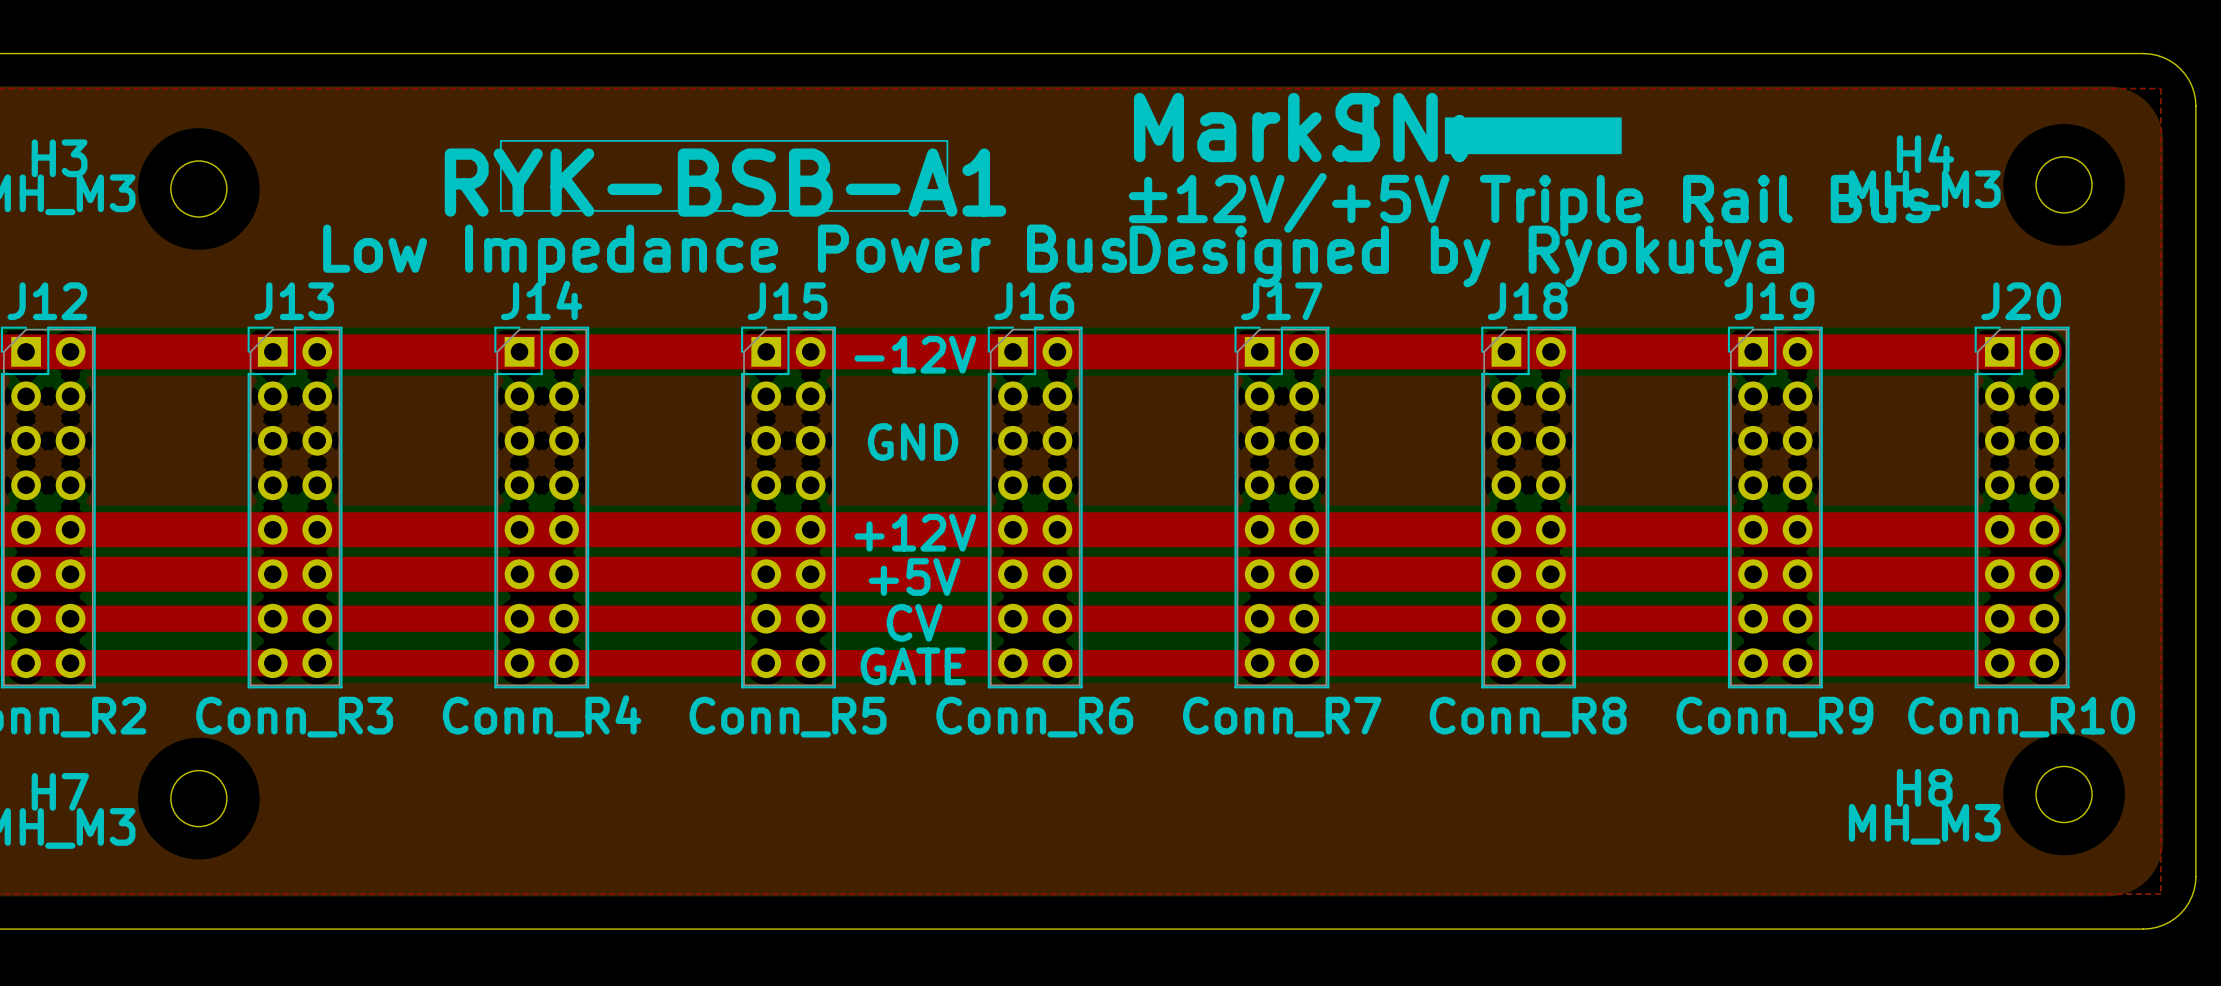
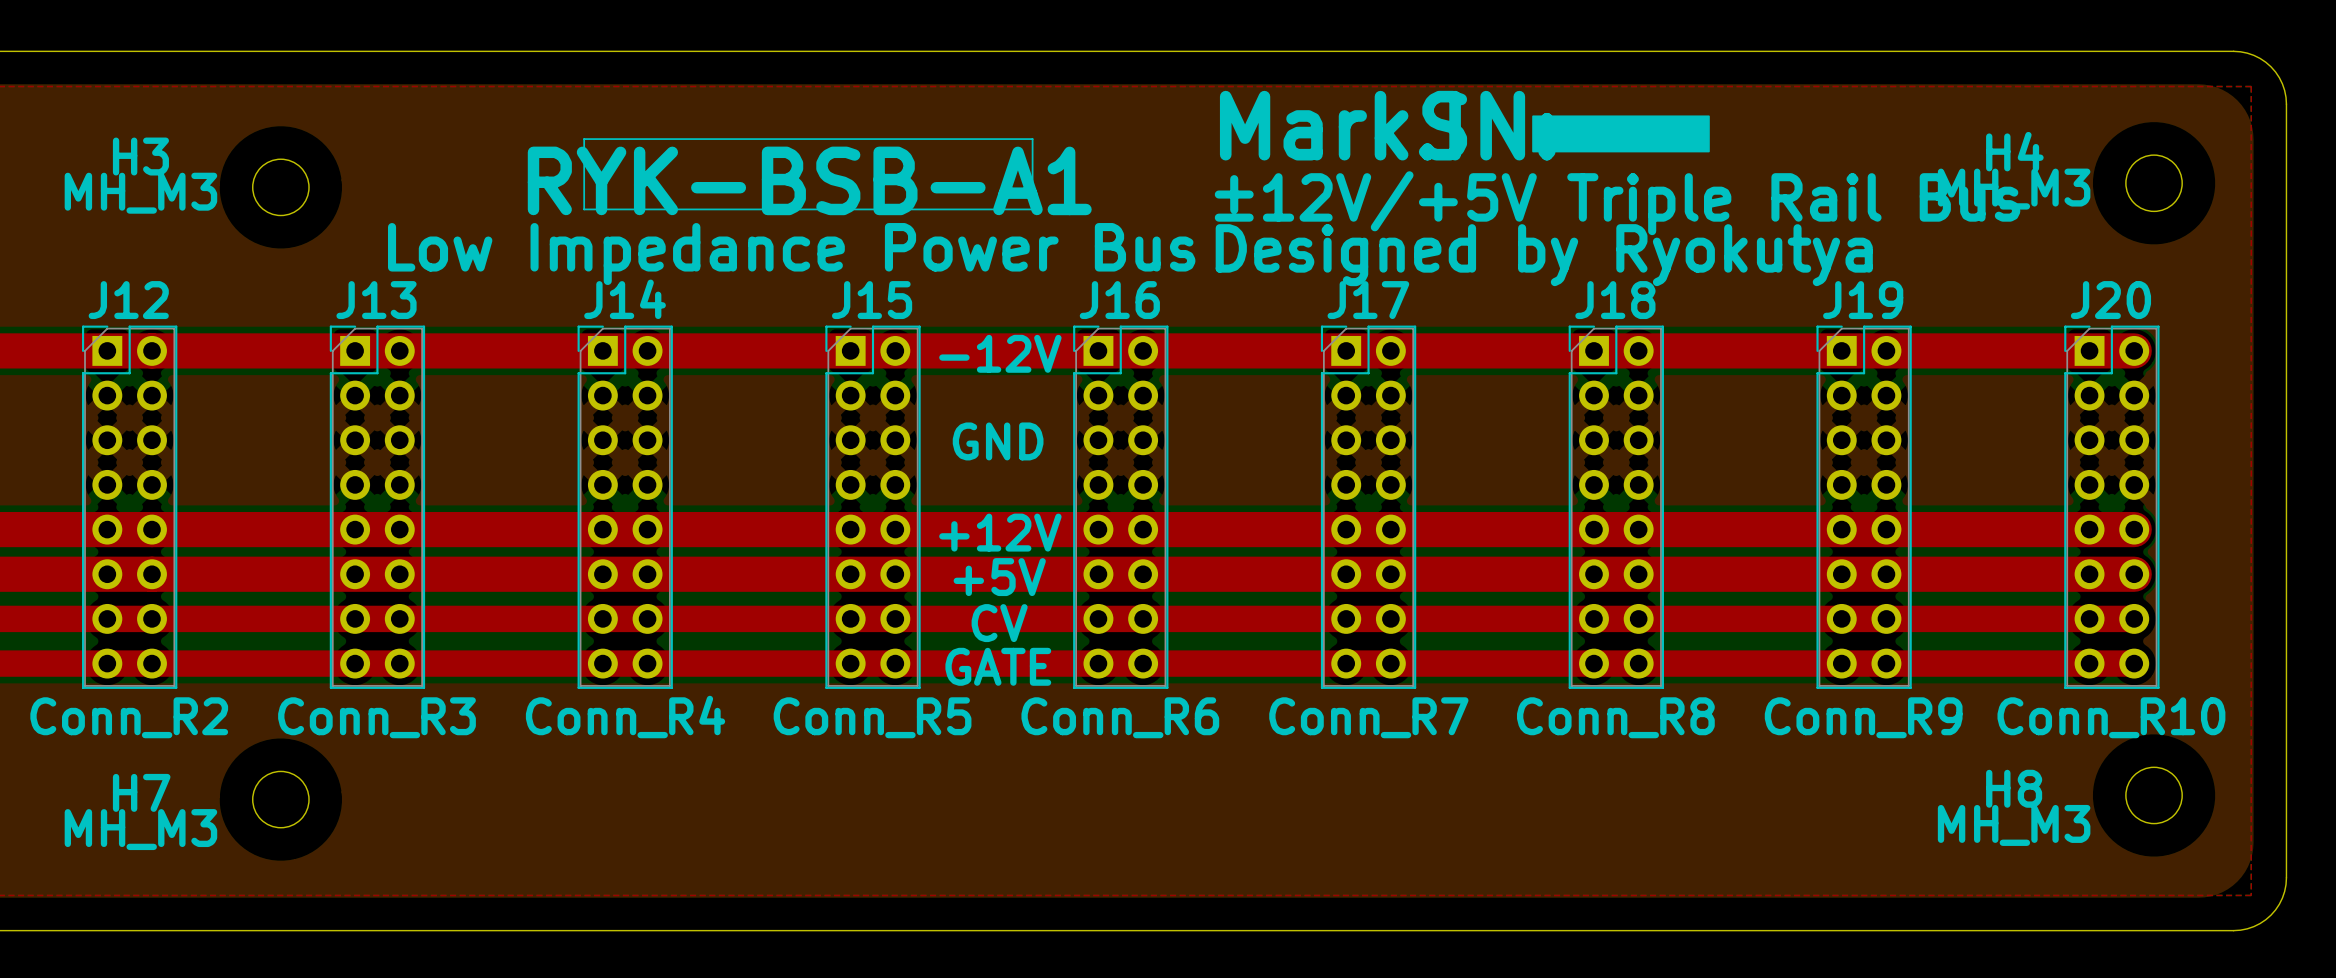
text position: Low Impedance Power Bus (725, 255) -> Low Impedance Power Bus (791, 254)

